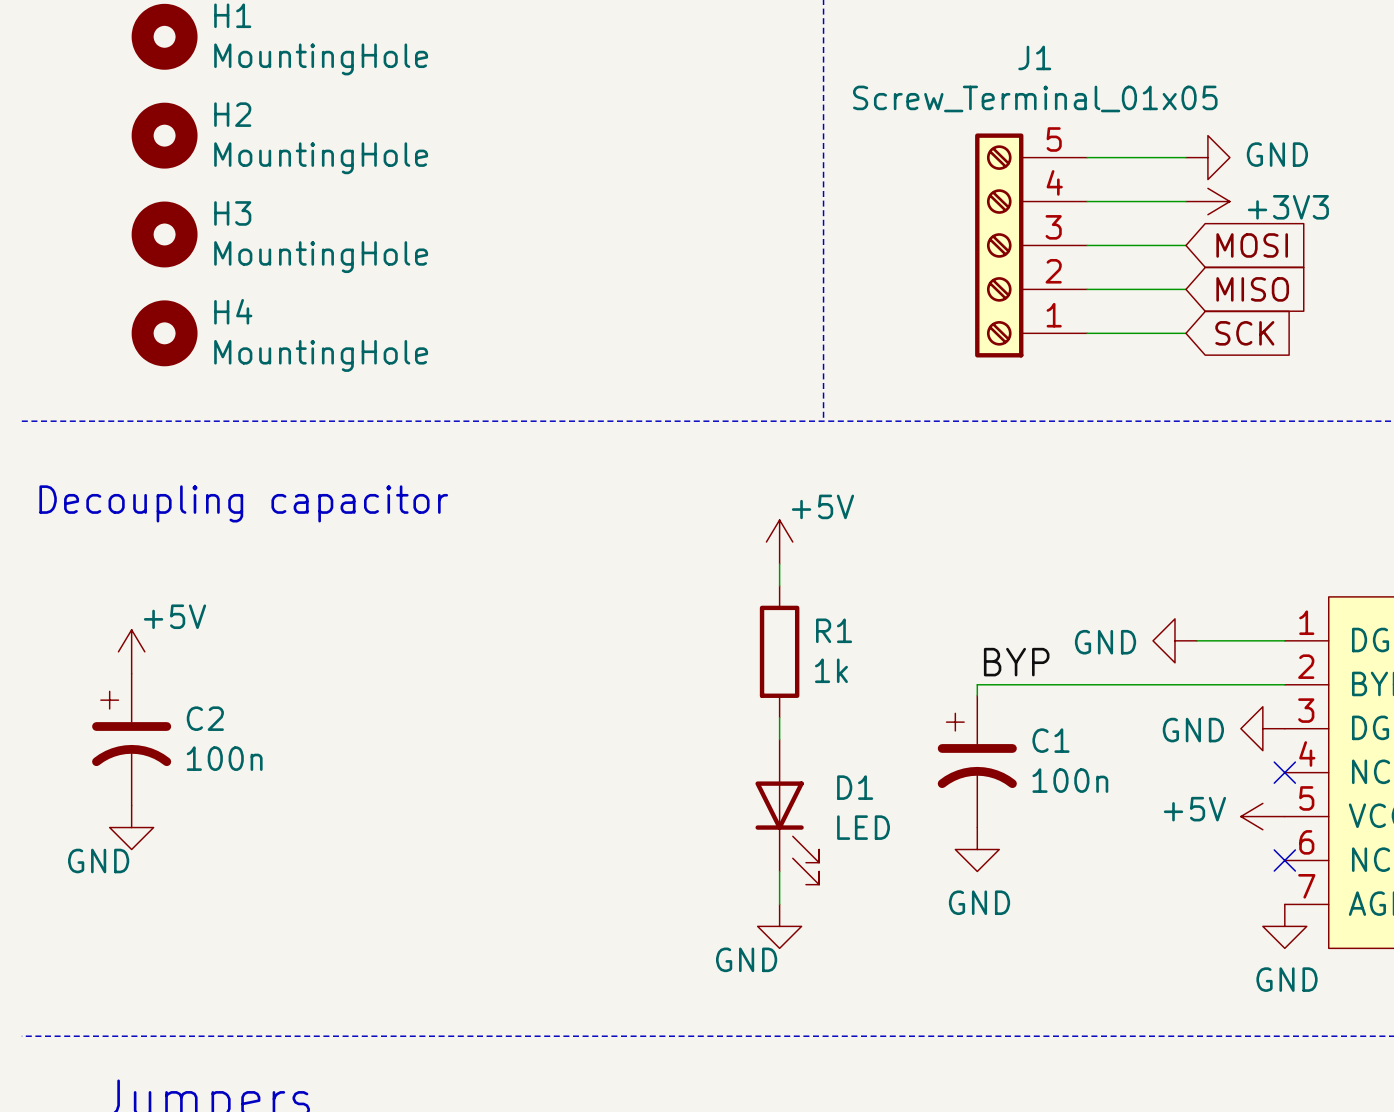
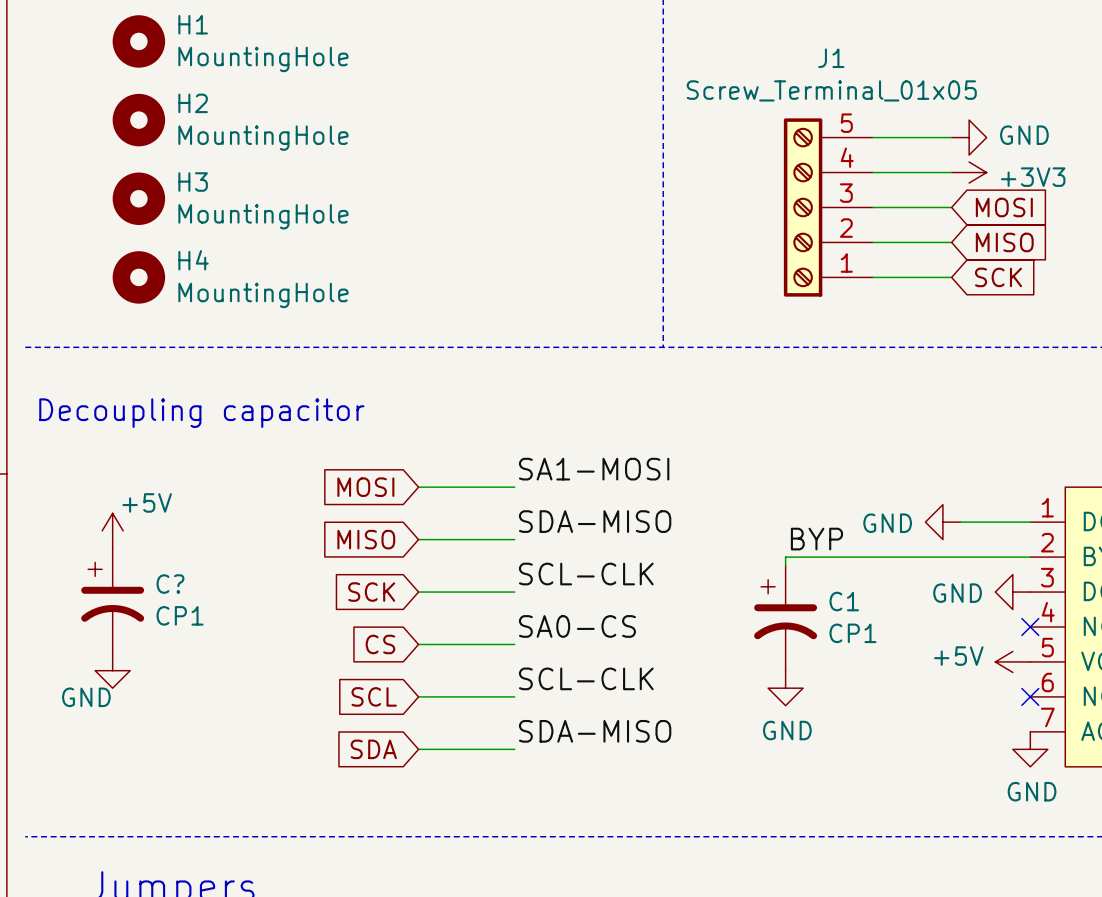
power symbol: +5V (779, 542) -> none
wire: (779, 563) (779, 585) -> none
label: none -> SA1-MOSI (594, 469)
global label: none -> MOSI (365, 487)
wire: none -> (418, 487) (514, 487)
label: none -> SDA-MISO (595, 521)
R1: 1k (779, 651) -> none
global label: none -> MISO (366, 539)
wire: none -> (418, 539) (514, 539)
label: none -> SCL-CLK (586, 574)
wire: (779, 717) (779, 739) -> none
C2 name: C2 (205, 718) -> C? (170, 584)
global label: none -> SCK (371, 592)
wire: none -> (418, 592) (514, 592)
C2 value: 100n (224, 758) -> CP1 (180, 615)
label: none -> SA0-CS (577, 626)
C1 value: 100n (1070, 780) -> CP1 (852, 633)
global label: none -> CS (380, 644)
wire: none -> (418, 644) (514, 644)
D1: LED (787, 812) -> none
label: none -> SCL-CLK (586, 678)
global label: none -> SCL (374, 696)
wire: none -> (418, 696) (514, 696)
wire: (779, 871) (779, 904) -> none
label: none -> SDA-MISO (595, 731)
global label: none -> SDA (373, 749)
wire: none -> (418, 749) (514, 749)
power symbol: GND (779, 926) -> none

